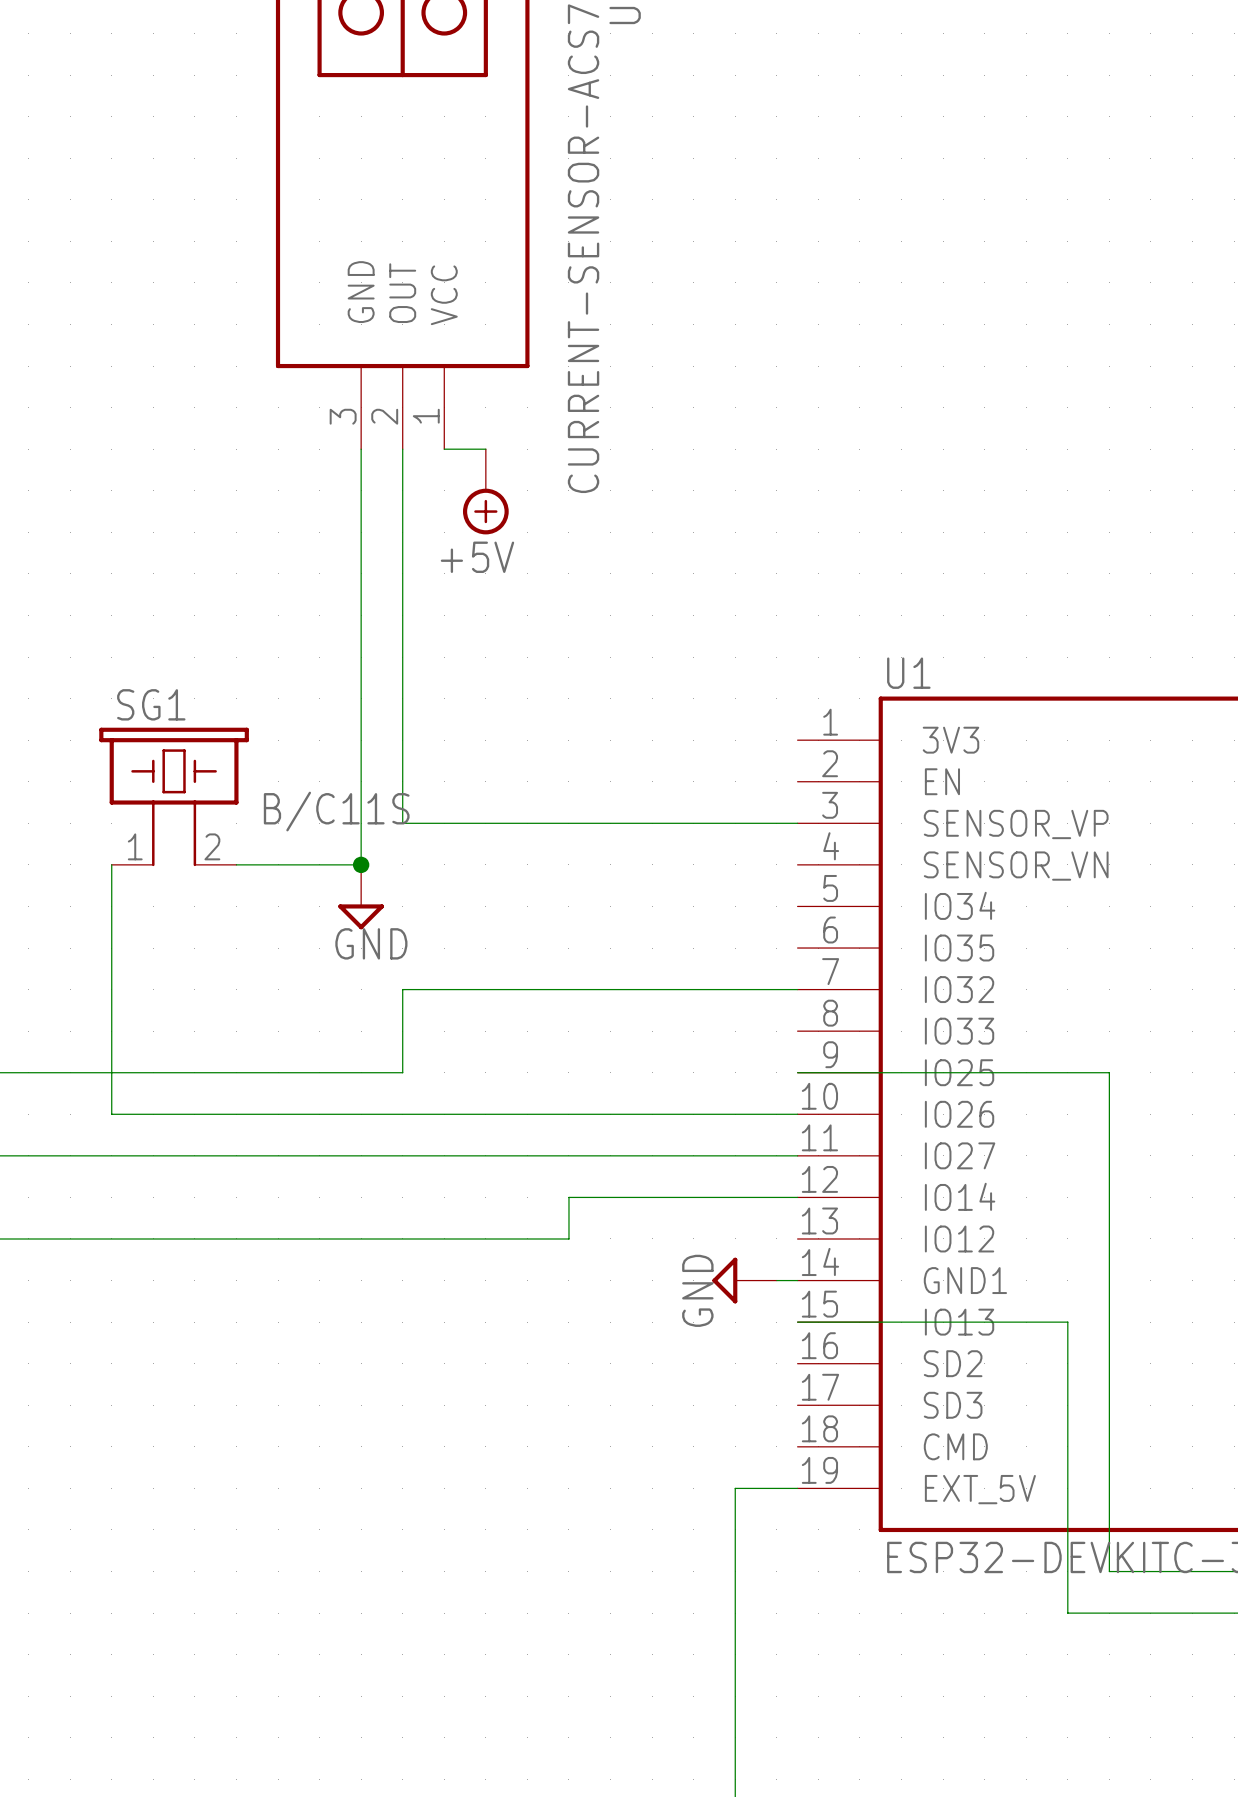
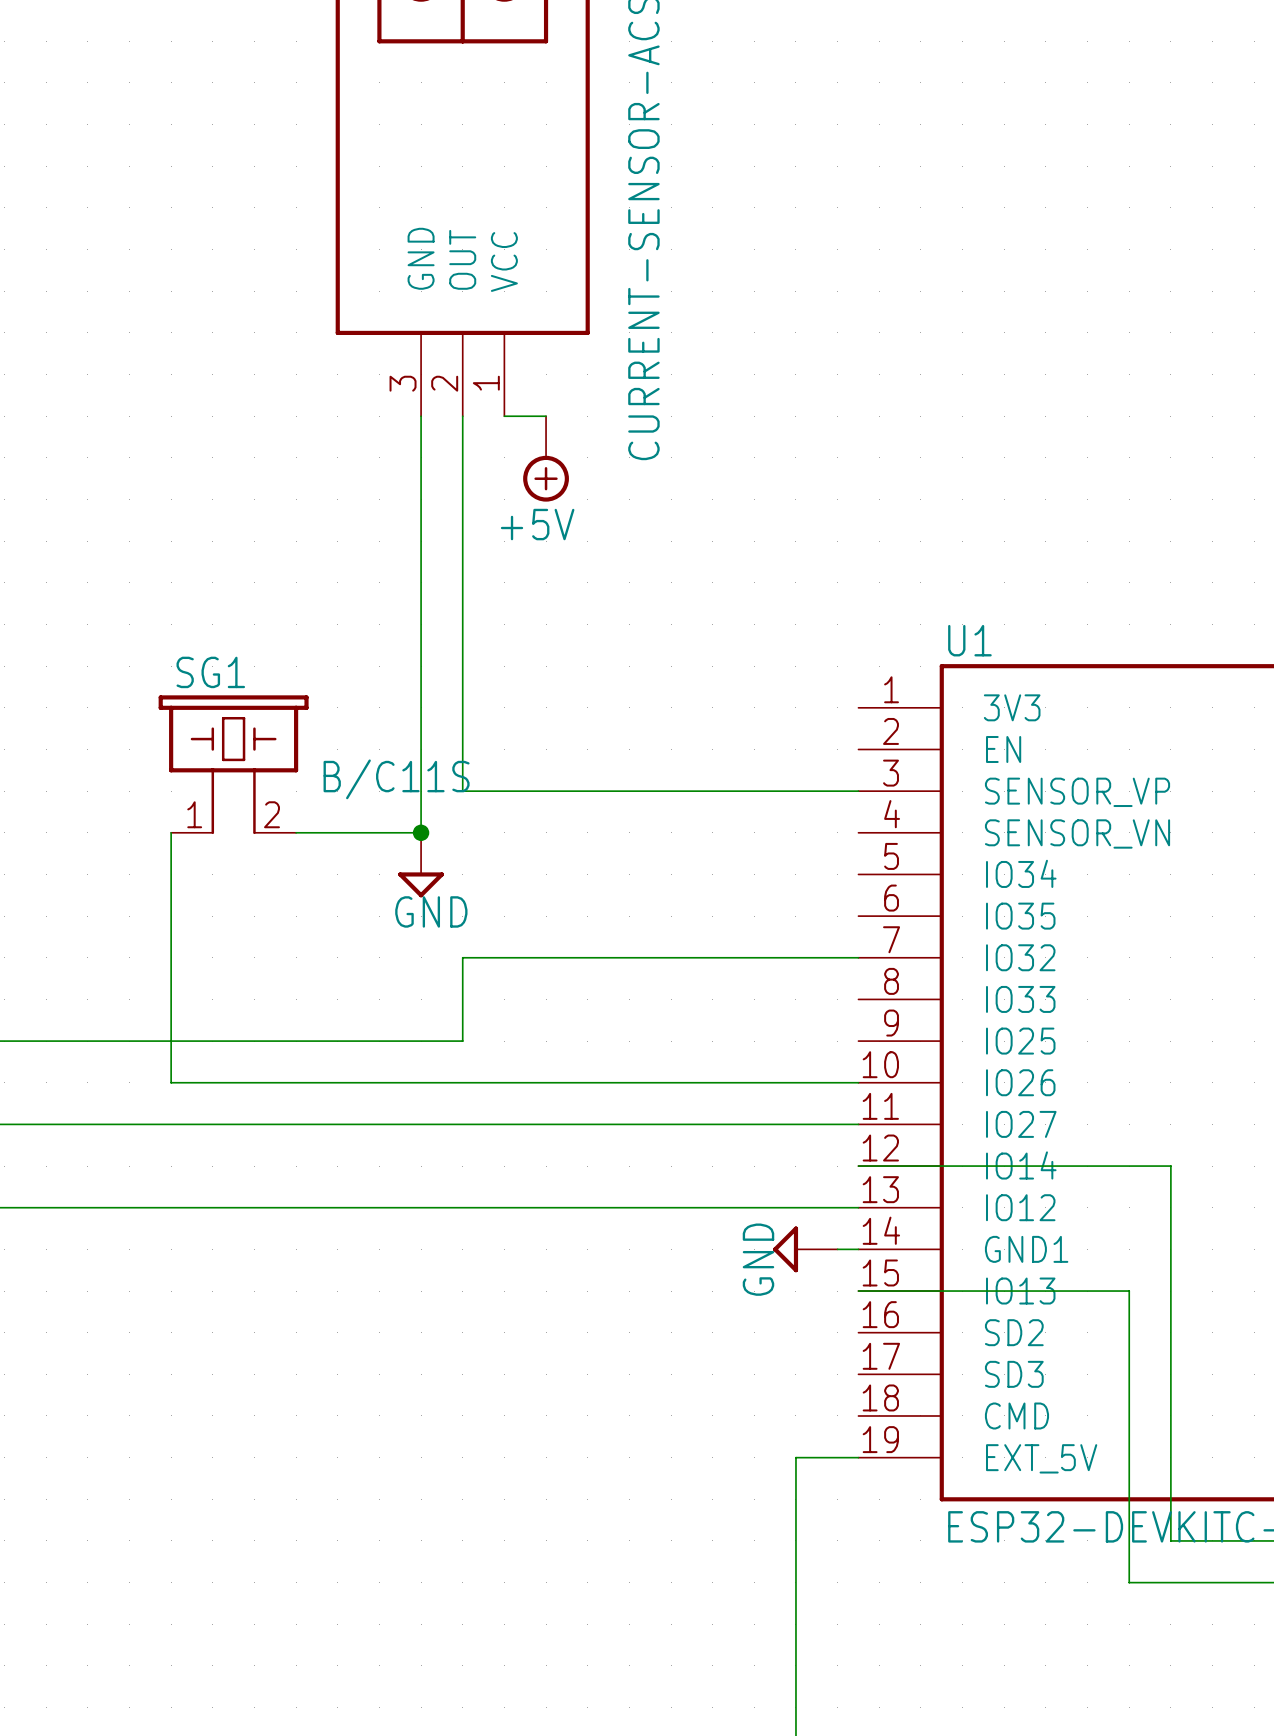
wire: (797, 1072) (1109, 1072) (1109, 1197) -> (858, 1166) (1170, 1166)
wire: (797, 1197) (568, 1197) (568, 1238) -> (858, 1207) (629, 1207)

